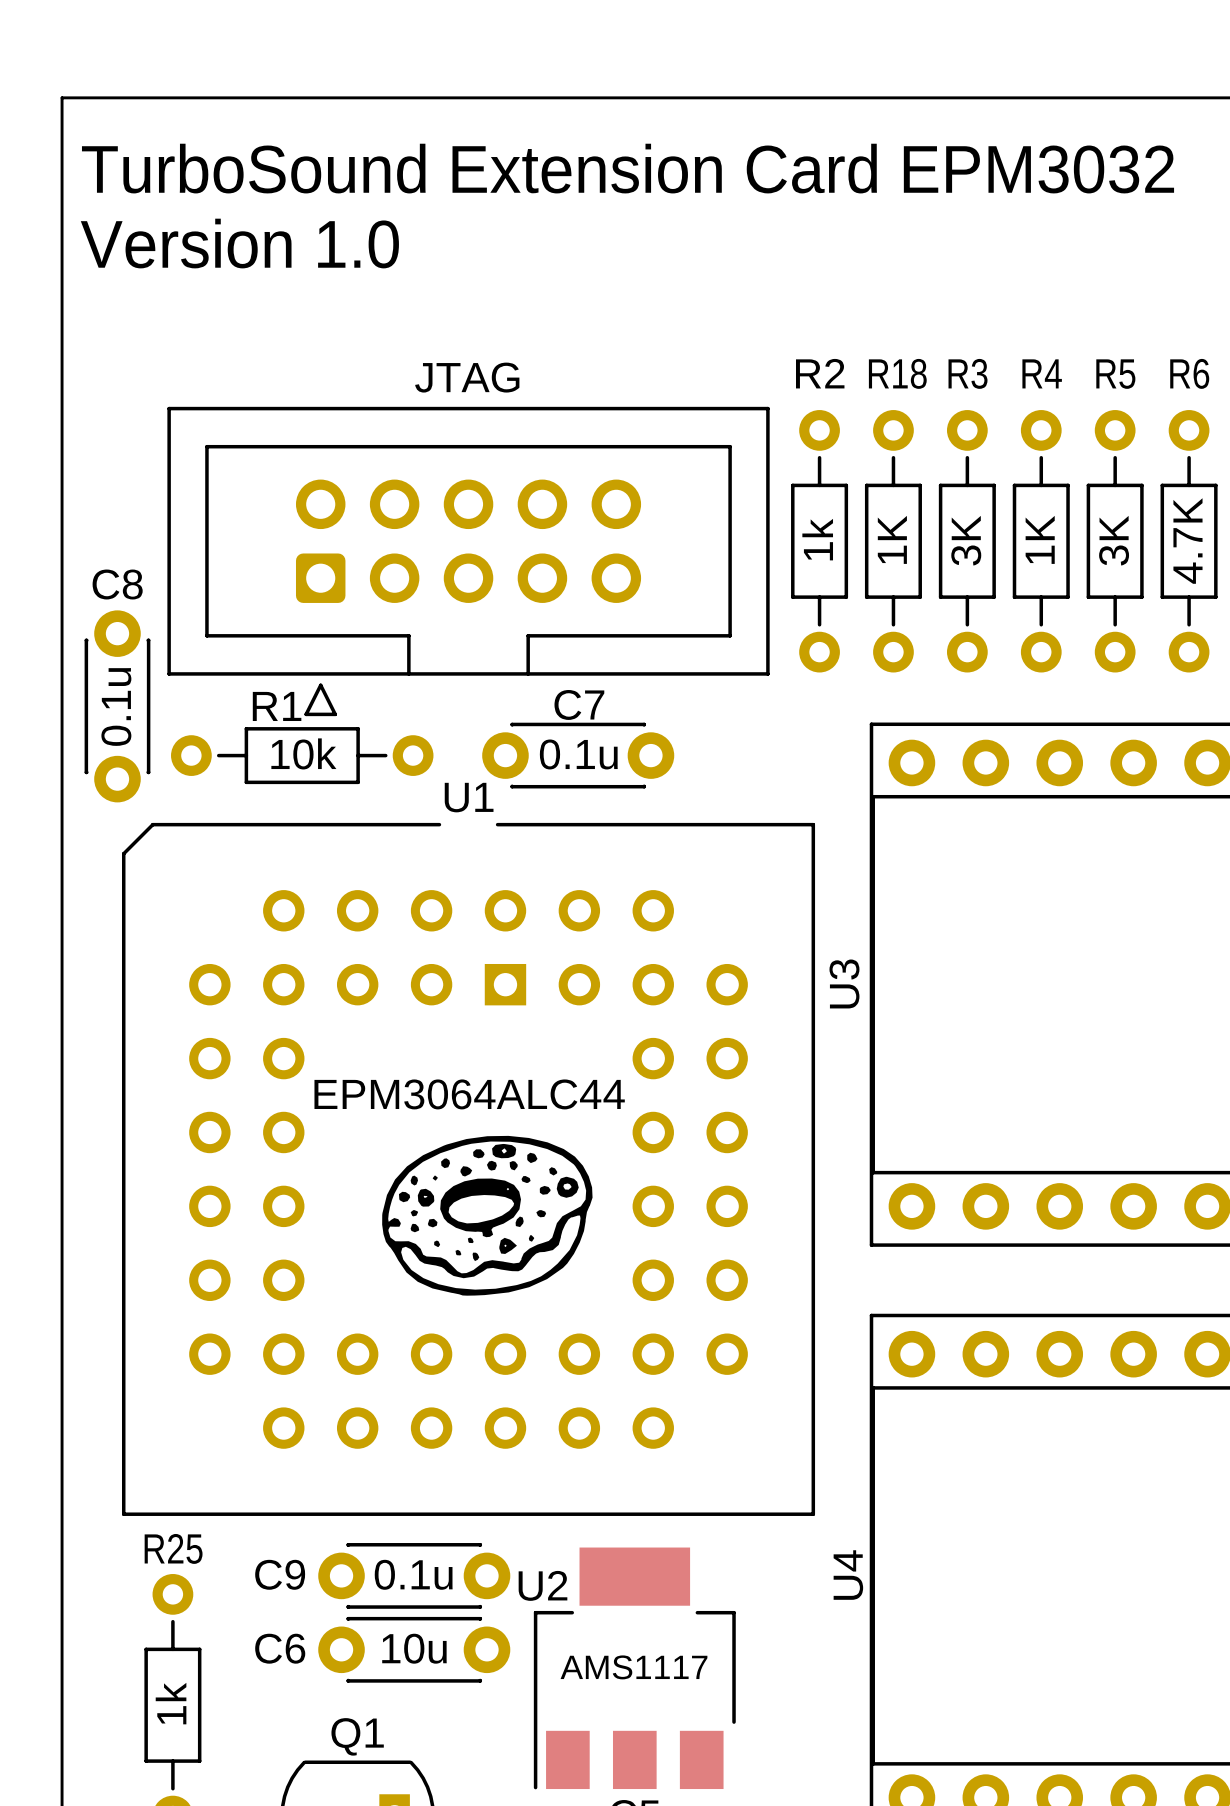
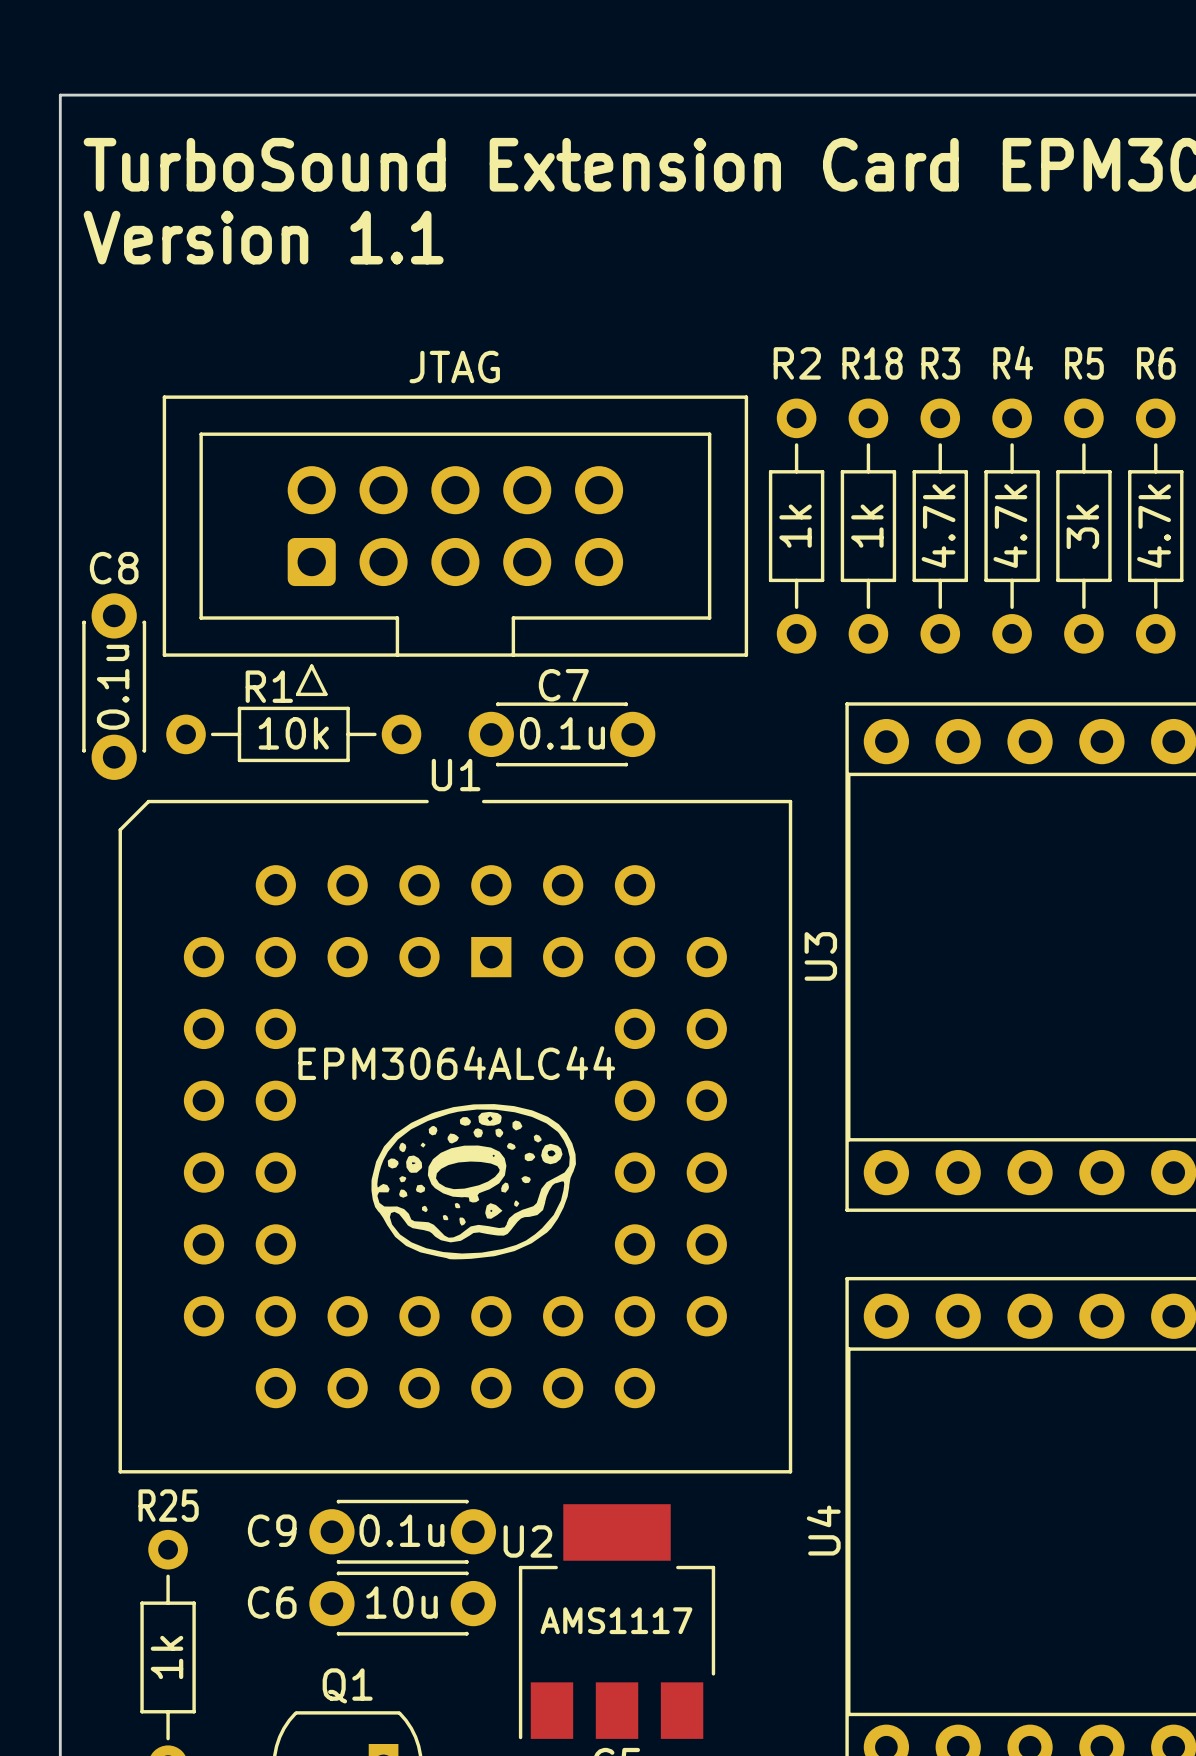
text: Version 1.0 (239, 243) -> Version 1.1 (263, 237)
R18 value: 1K (892, 539) -> 1k (867, 526)
R4 value: 1K (1040, 539) -> 4.7k (1010, 526)
R3 value: 3K (966, 540) -> 4.7k (938, 526)
R5 value: 3K (1114, 540) -> 3k (1082, 526)
R6 value: 4.7K (1187, 541) -> 4.7k (1154, 526)

